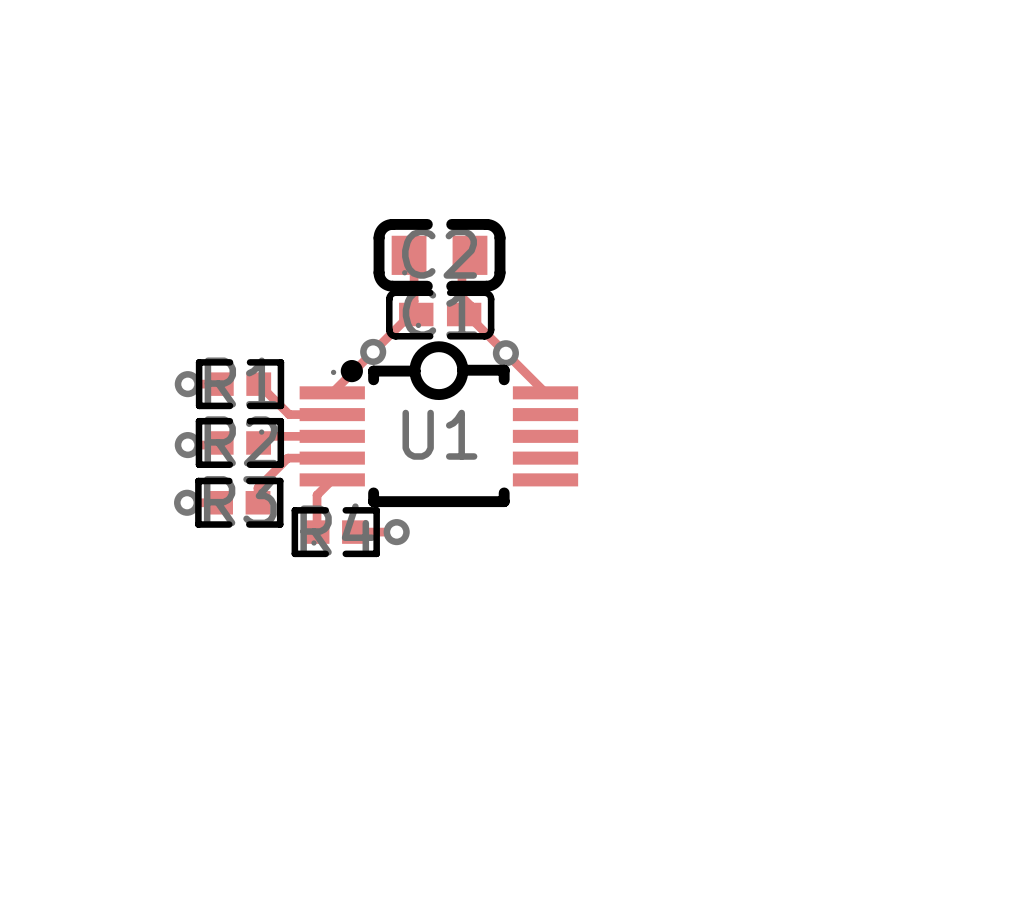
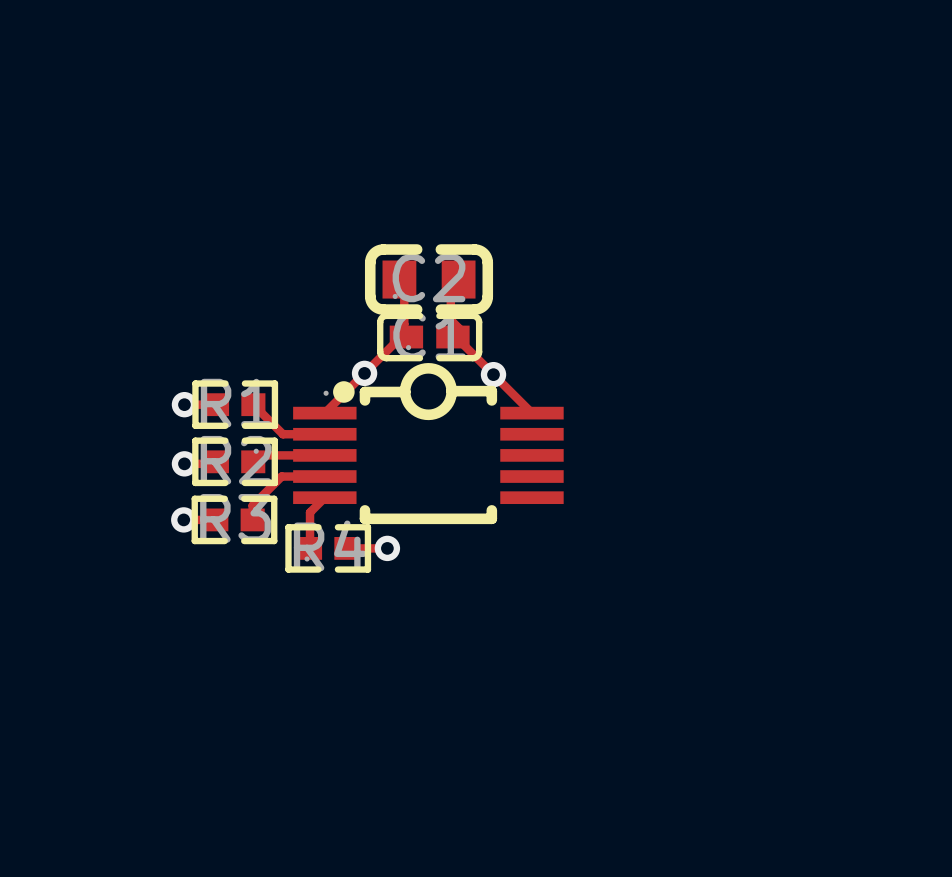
U1 name: U1 (439, 434) -> none

